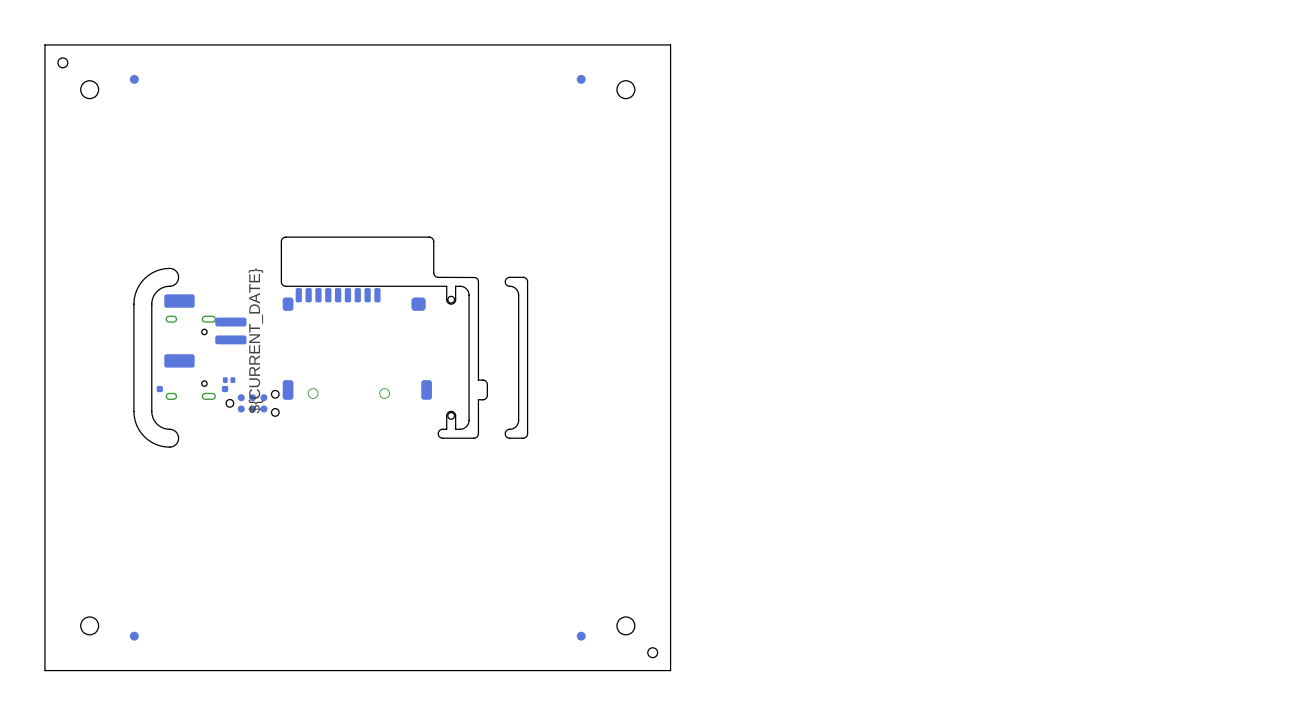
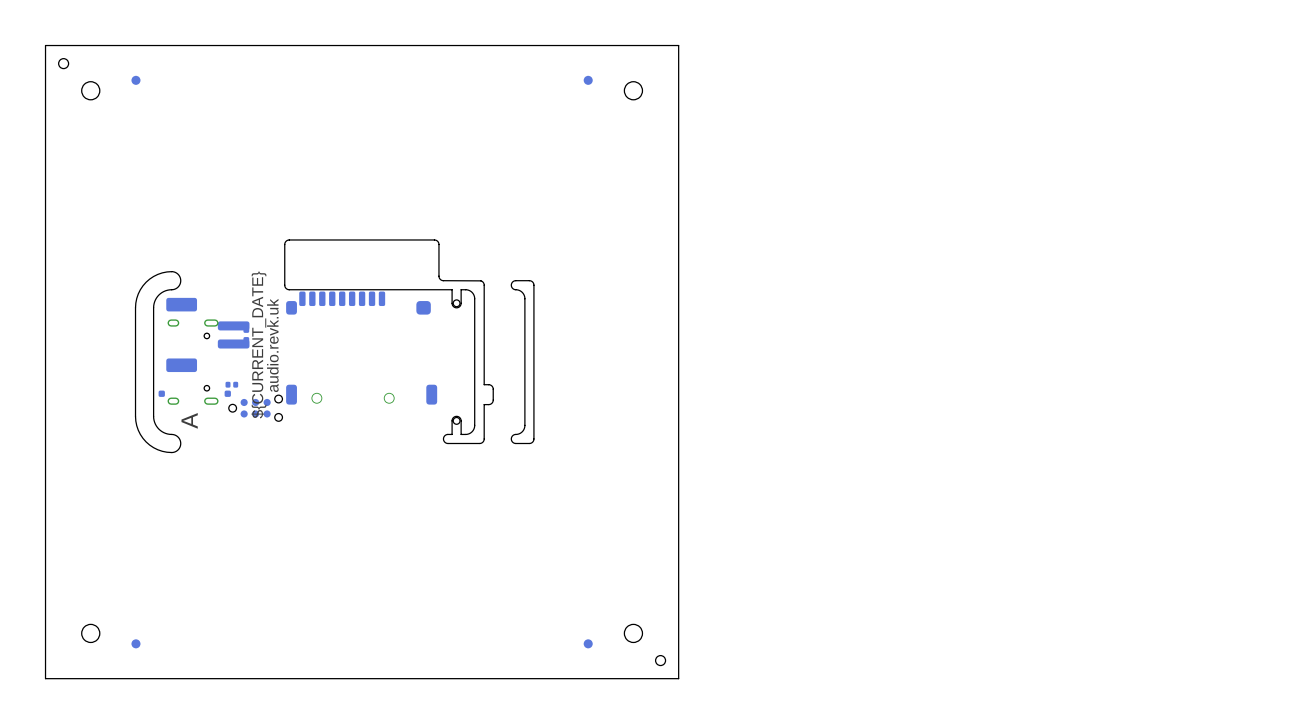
part: none -> (246, 334)
text: none -> audio.revk.uk (272, 345)
text: none -> A (189, 420)

